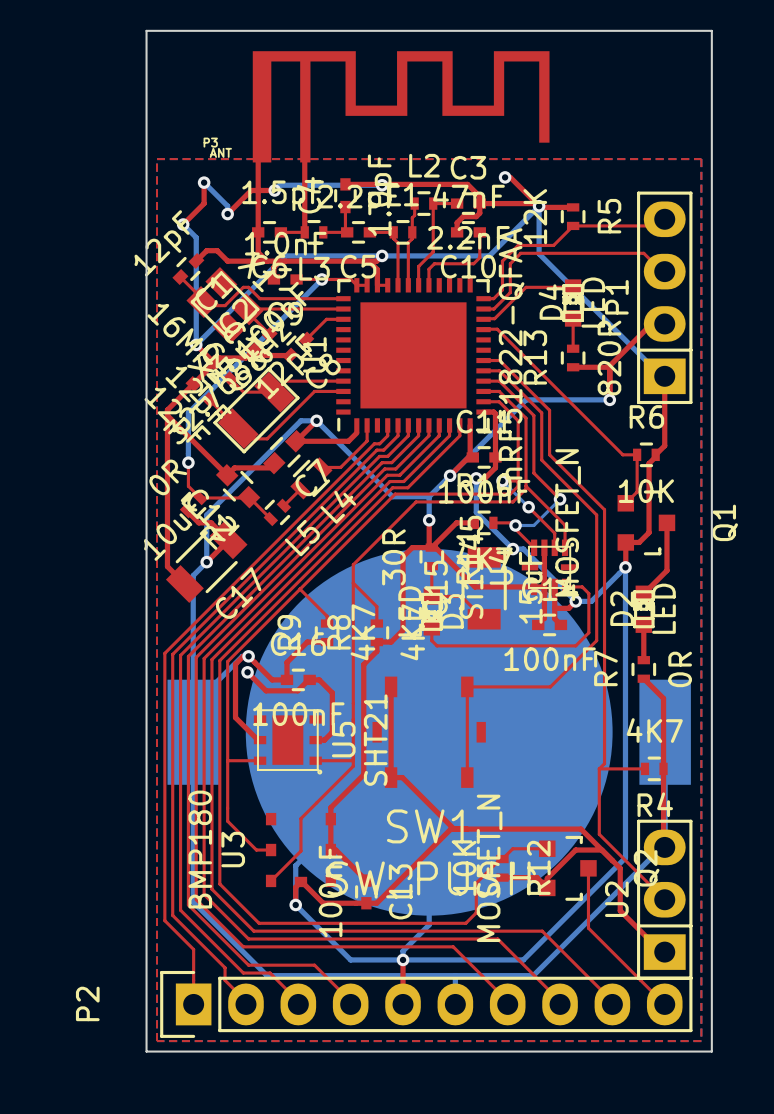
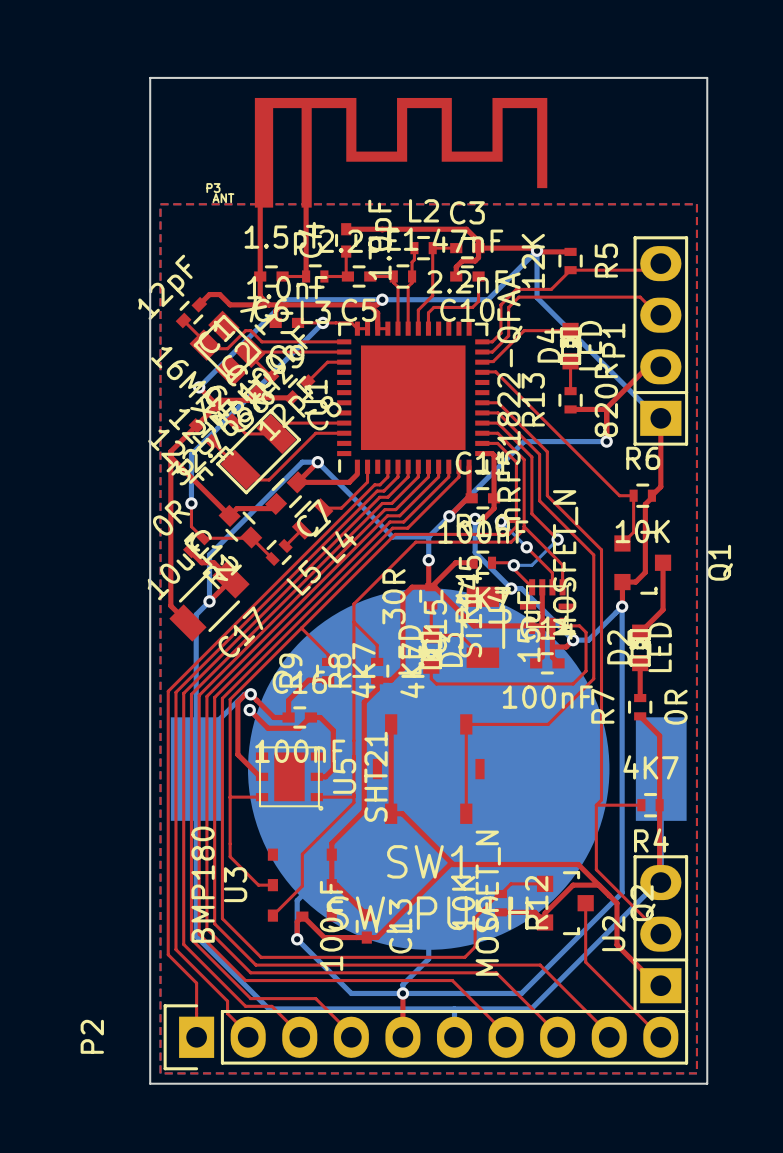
top track: (505, 177) (510, 177) (539, 206) -> none
via: (505, 177) -> none
top track: (204, 182) (204, 203) (183, 224) -> none
bottom track: (204, 182) (227, 206) (227, 214) -> none
via: (204, 182) -> none
bottom track: (382, 185) (280, 185) (274, 190) -> none
via: (382, 185) -> none
top track: (274, 190) (251, 190) (227, 214) -> none
via: (274, 190) -> none
via: (227, 214) -> none
bottom track: (183, 224) (196, 237) (196, 344) -> none
via: (183, 224) -> none

